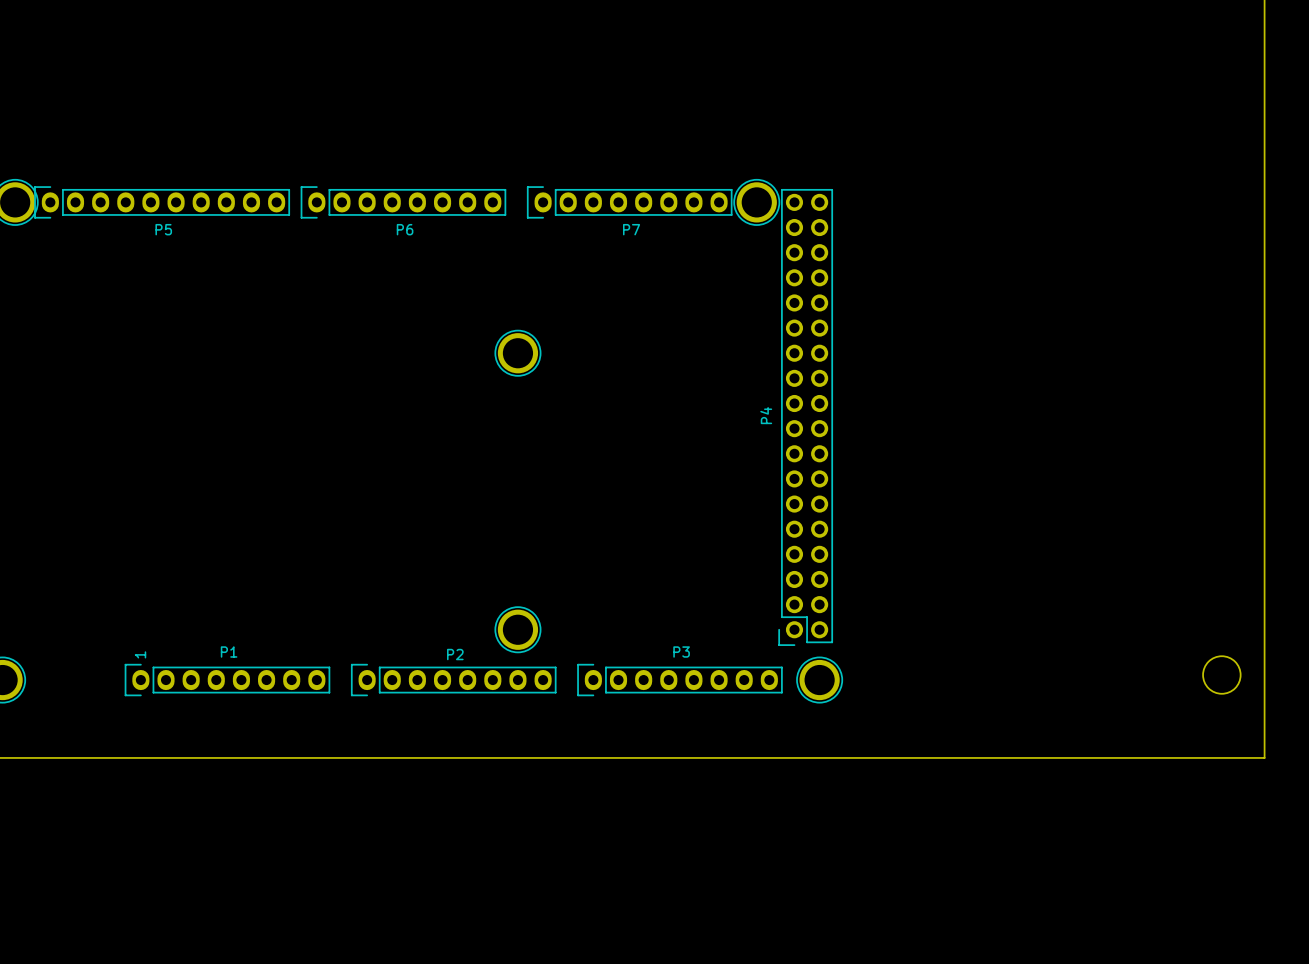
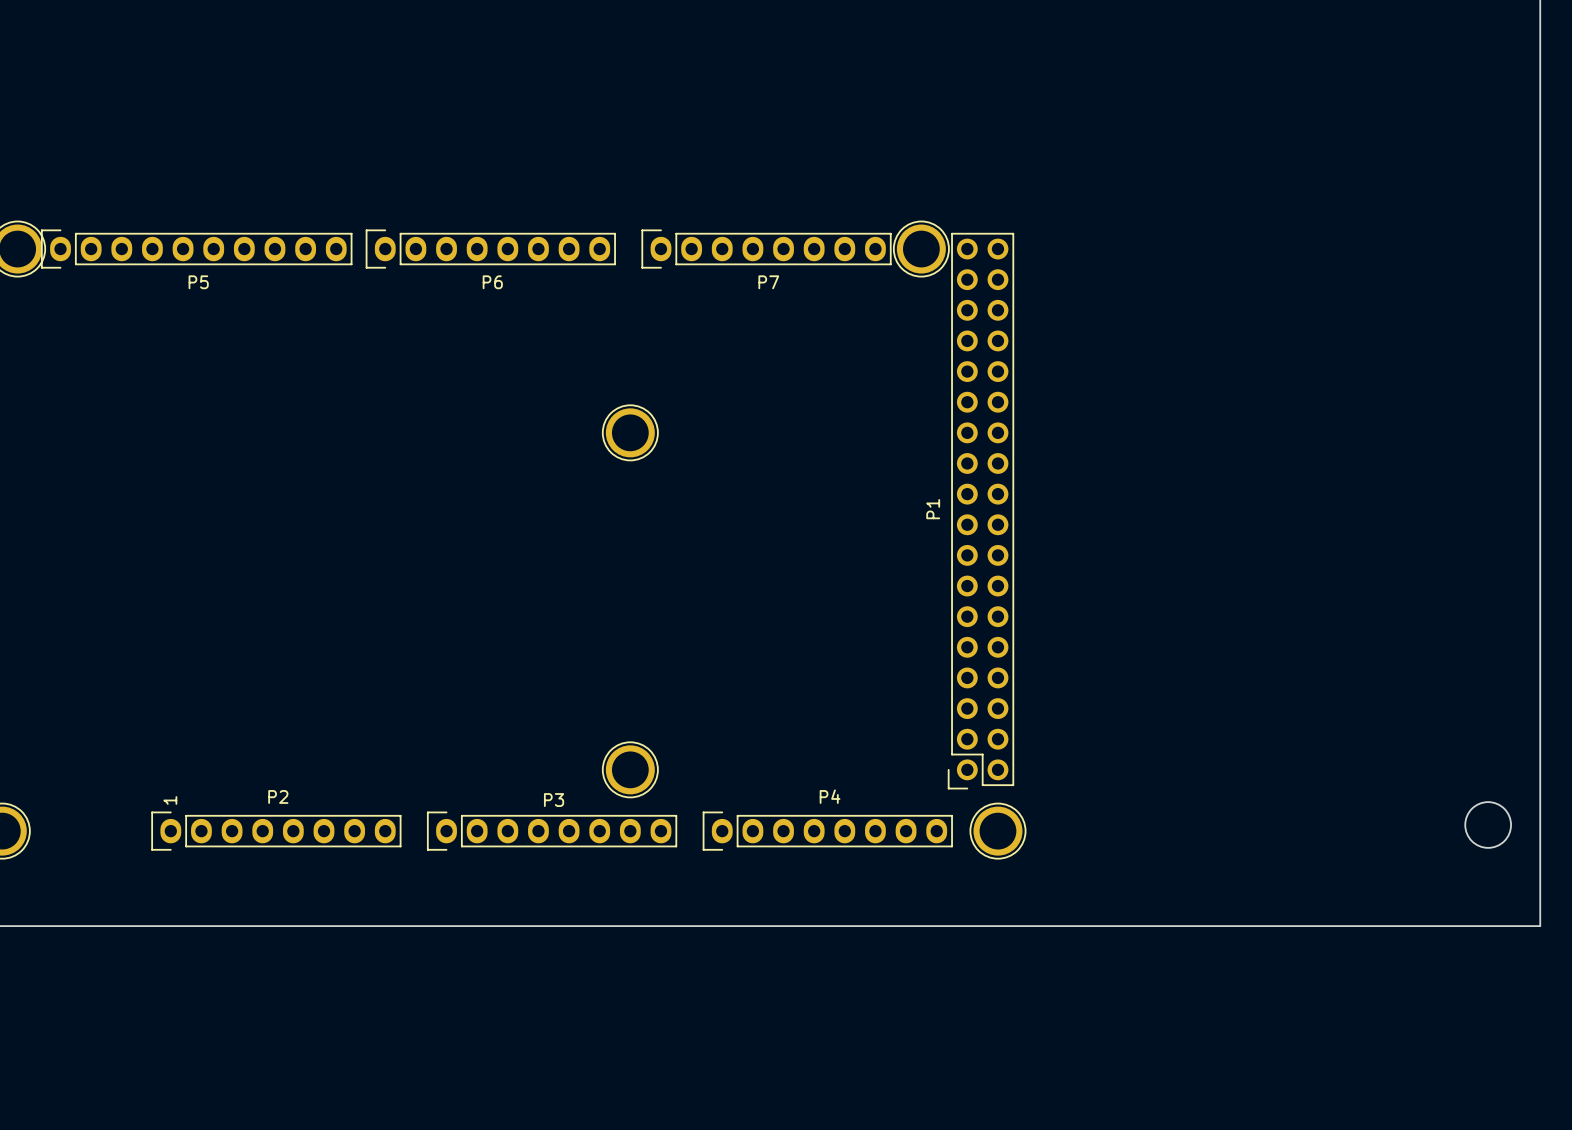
P4 name: P4 (766, 415) -> P1 (933, 509)
P1 name: P1 (229, 652) -> P2 (278, 796)
P3 name: P3 (681, 652) -> P4 (830, 796)
P2 name: P2 (455, 654) -> P3 (554, 800)

